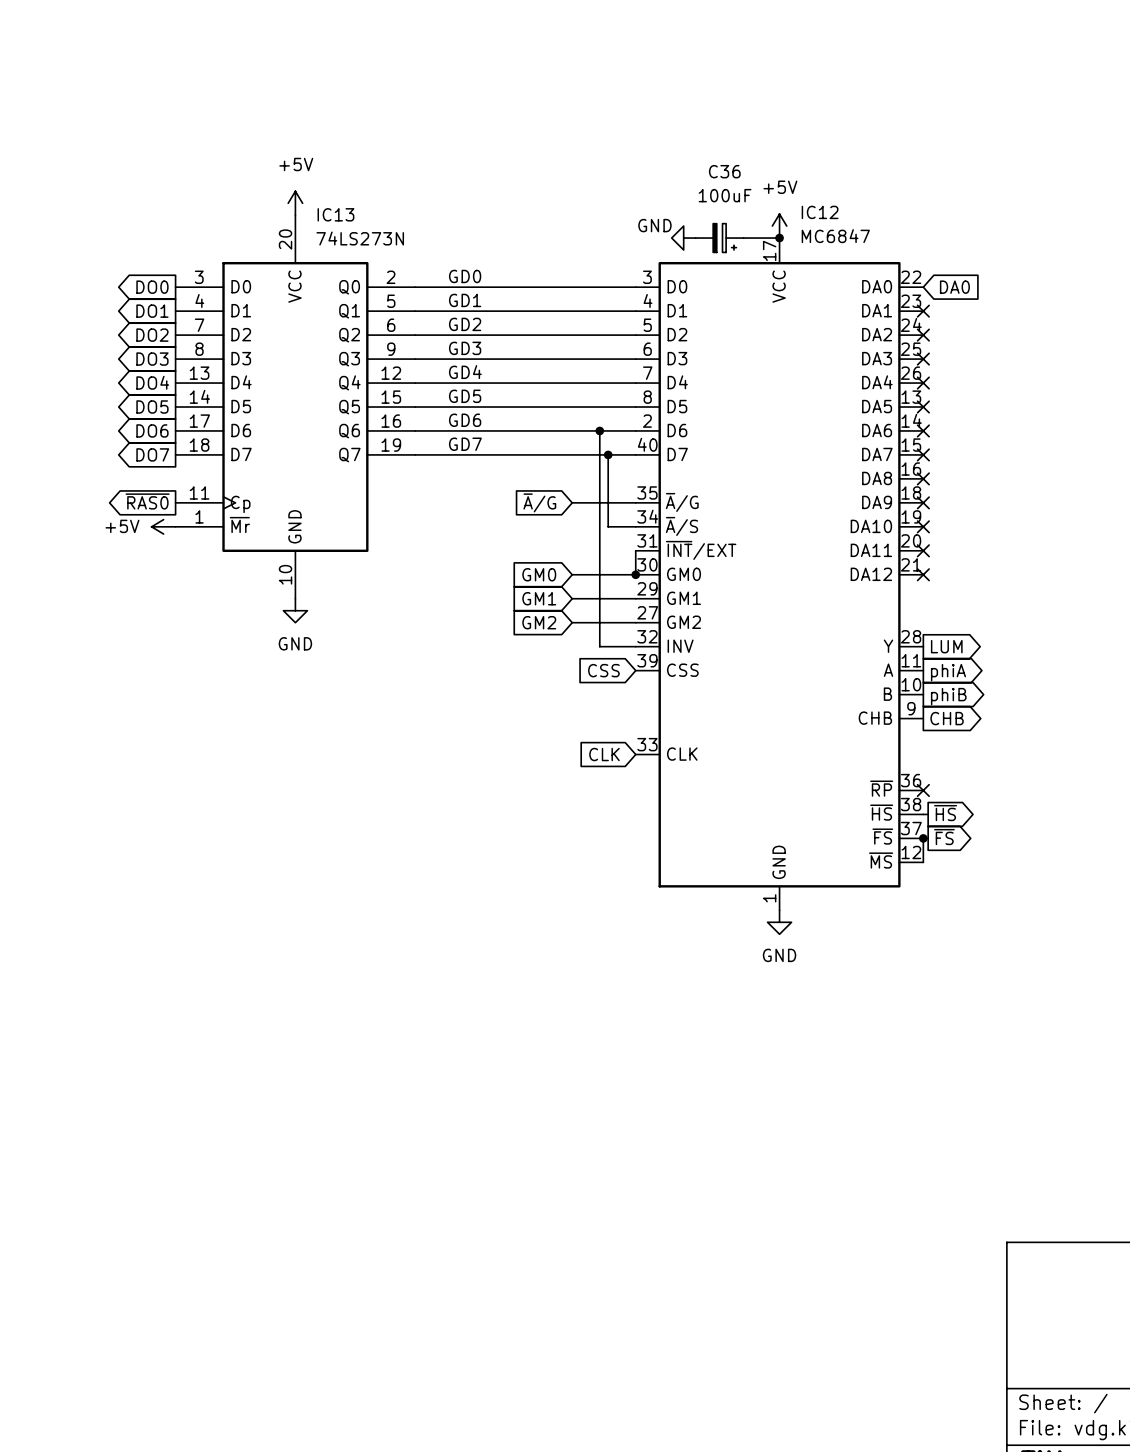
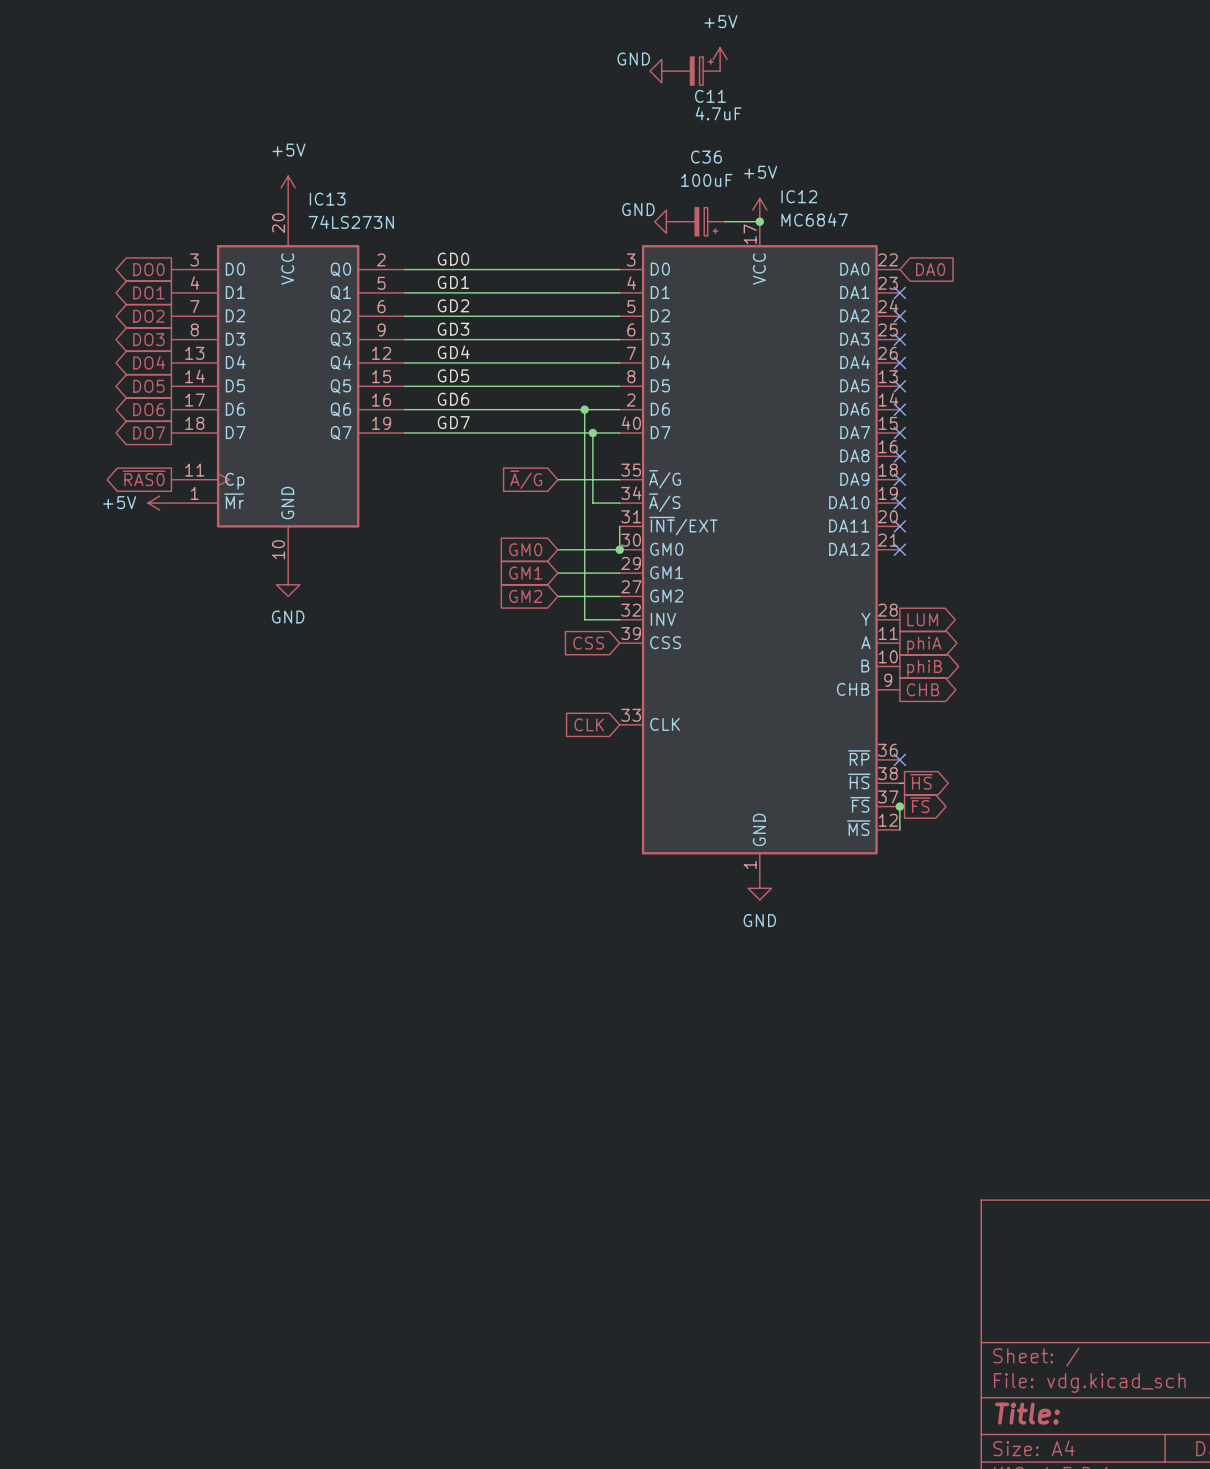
power symbol: none -> +5V (720, 59)
power symbol: none -> GND (661, 71)
C11: none -> 4.7uF (696, 71)

